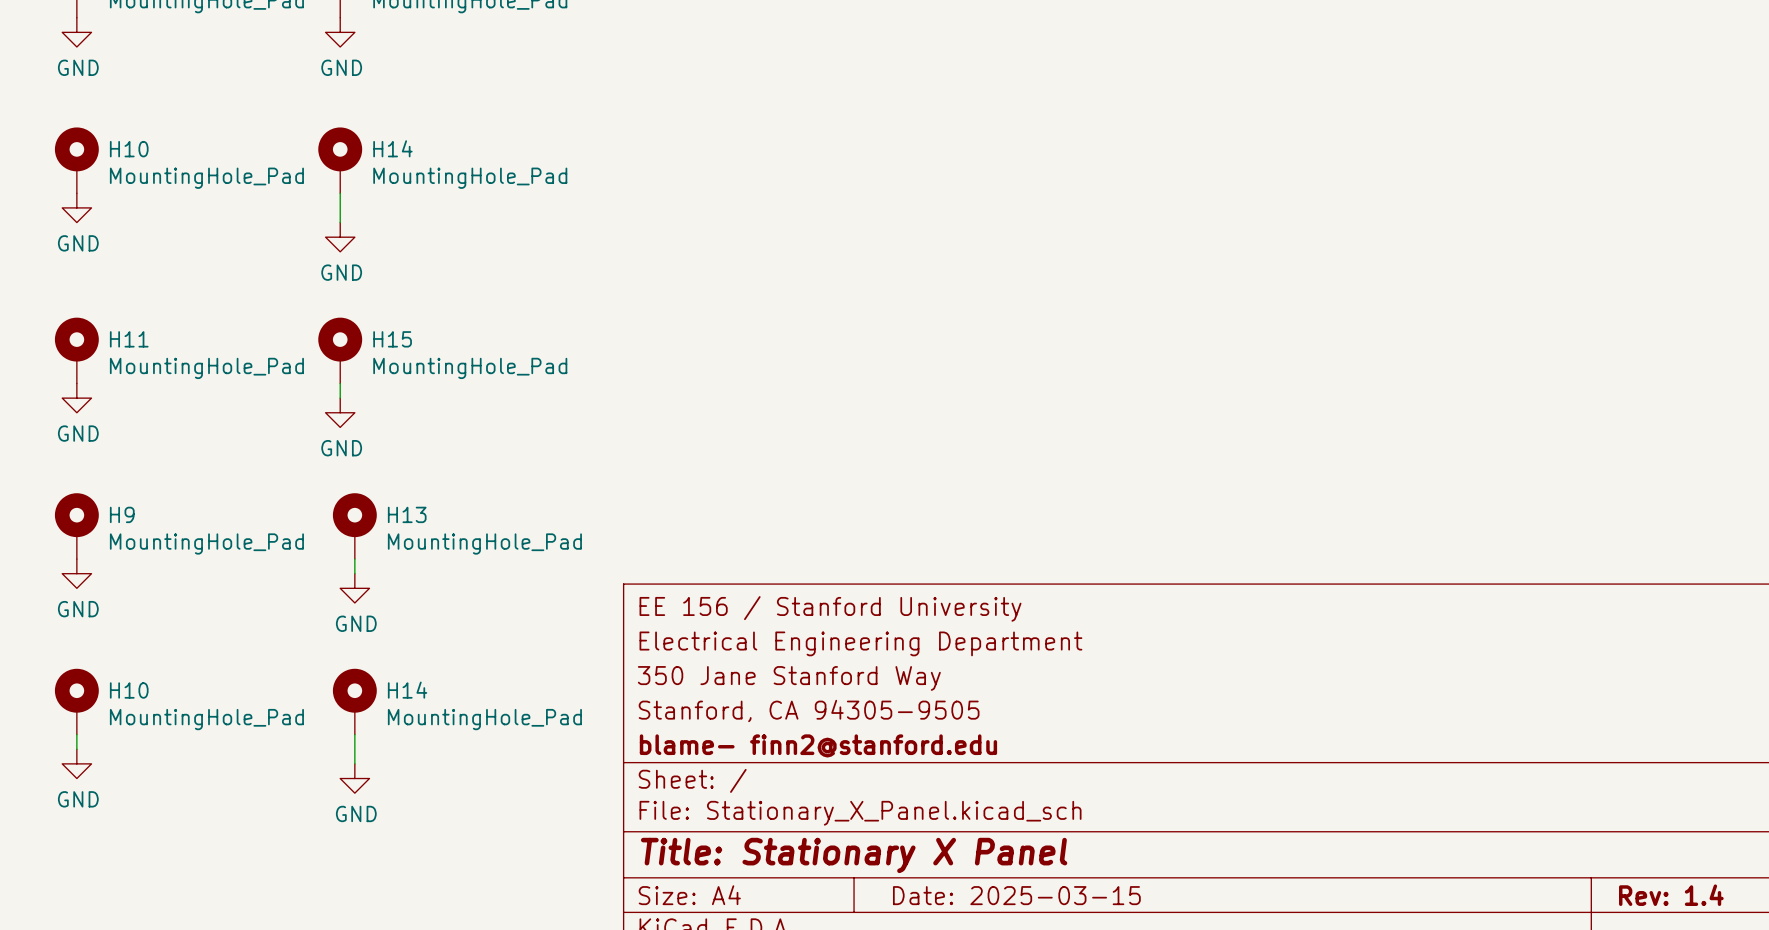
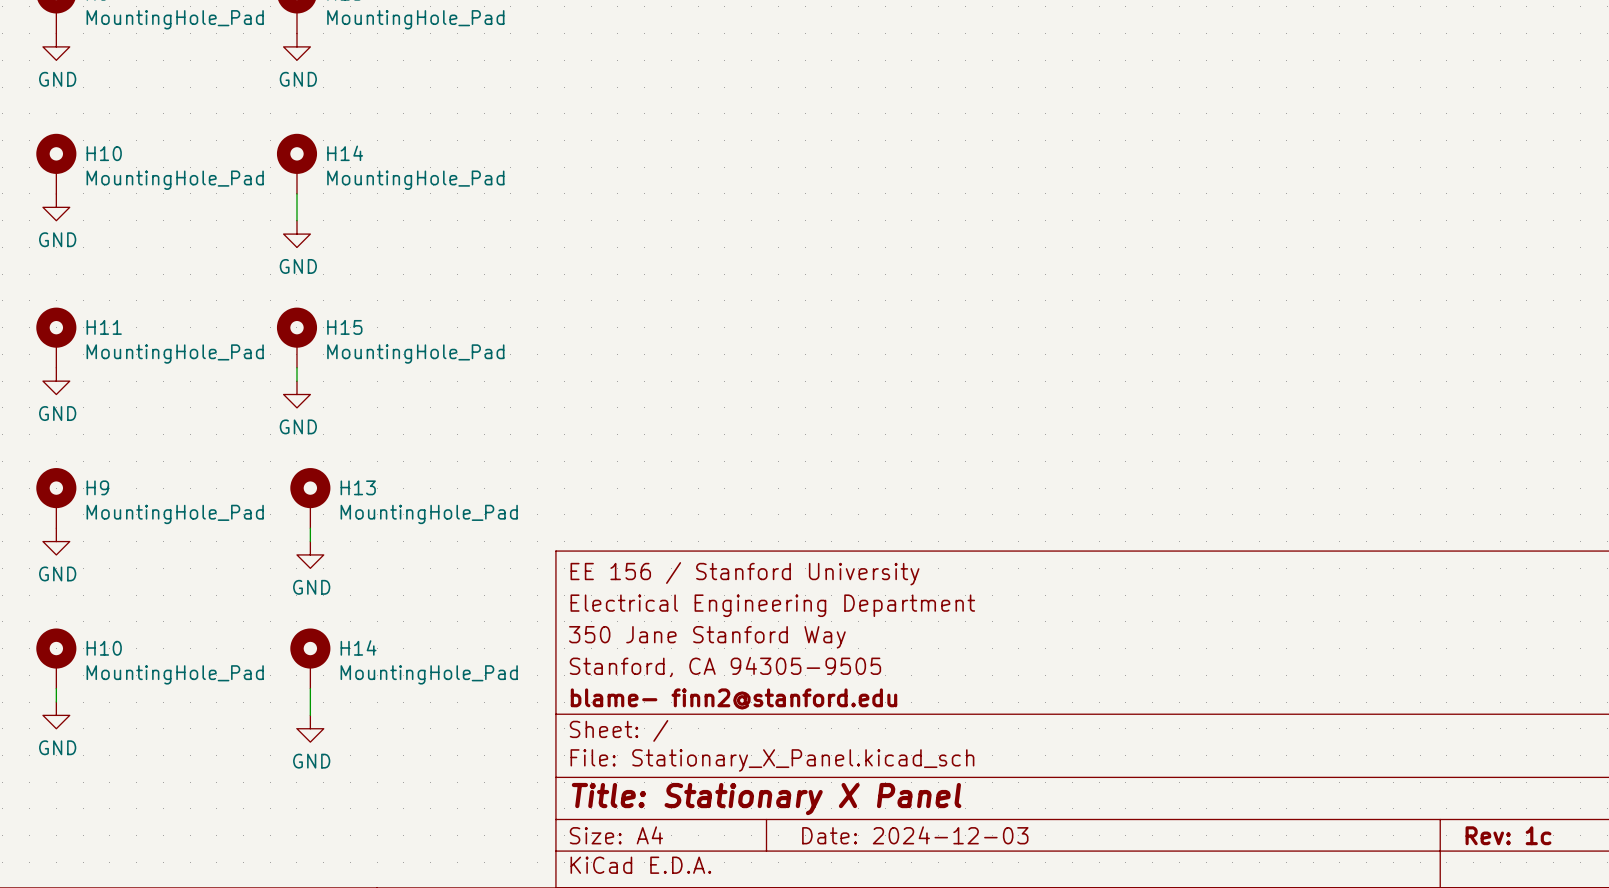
title block: Date: 2025-03-15 (1016, 895) -> Date: 2024-12-03 (915, 835)
title block: Rev: 1.4 (1671, 895) -> Rev: 1c (1508, 835)

